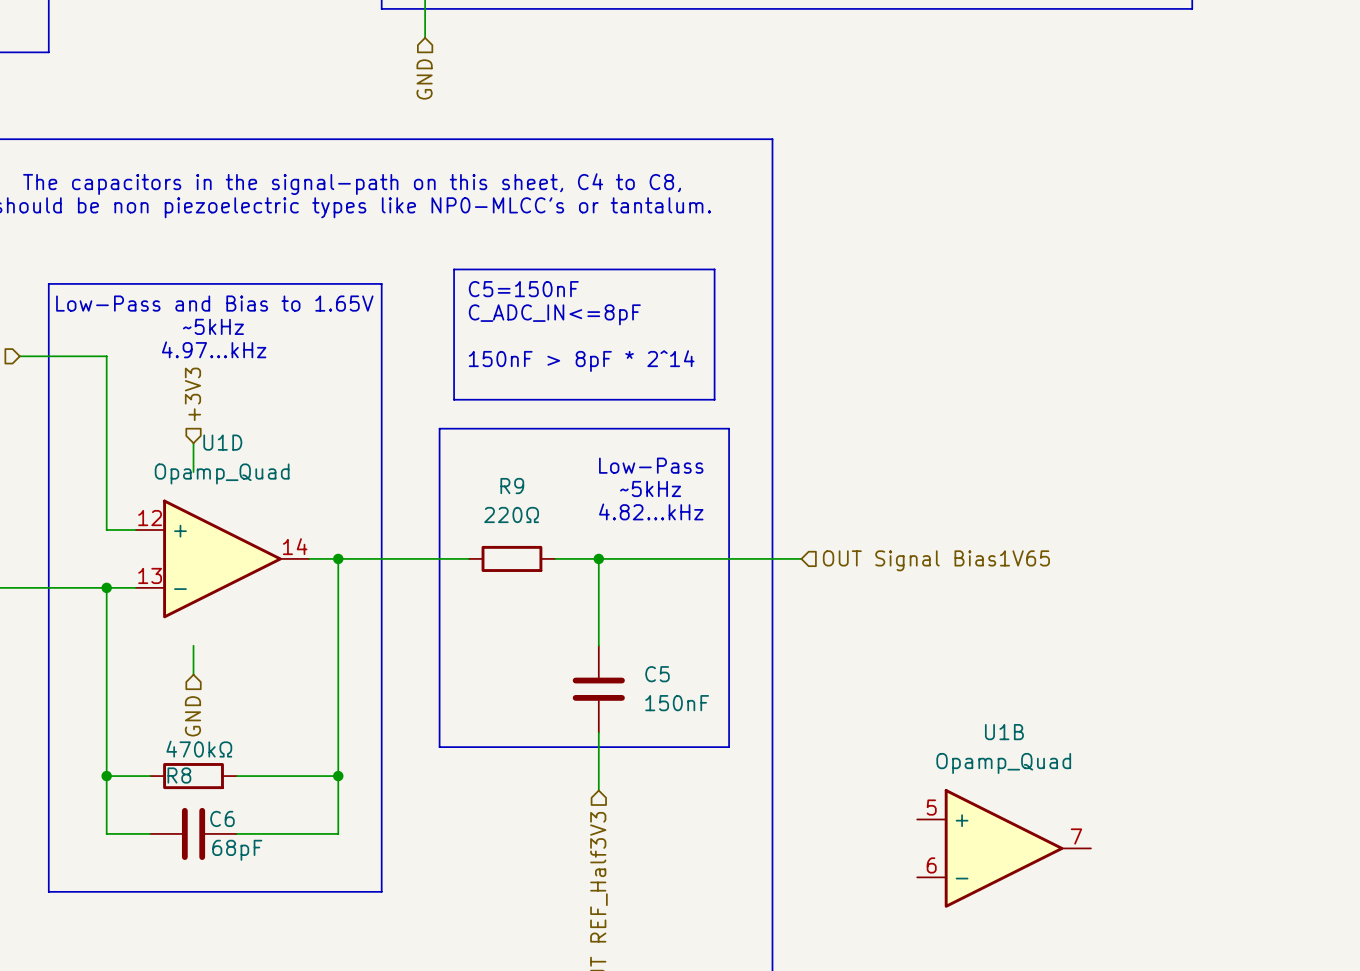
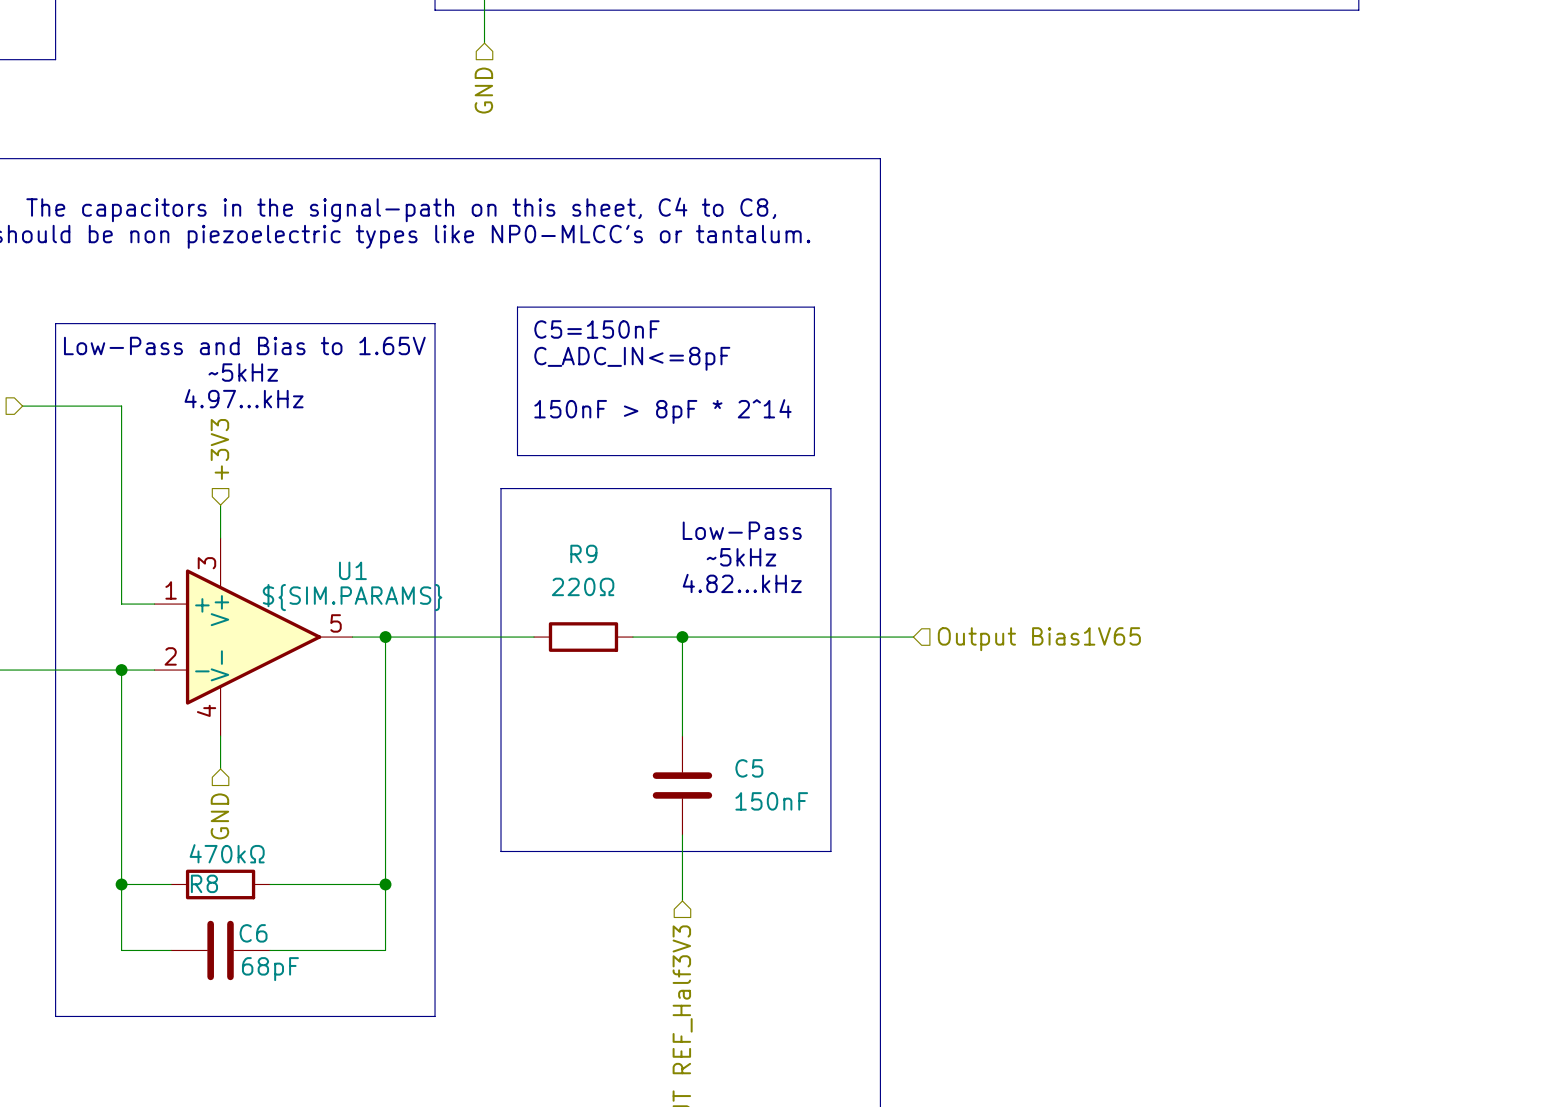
U1D: Opamp_Quad (222, 558) -> none
U1: none -> ${SIM.PARAMS} (253, 637)
hierarchical label: OUT Signal Bias1V65 (936, 560) -> Output Bias1V65 (1039, 639)
U1B: Opamp_Quad (1004, 848) -> none

